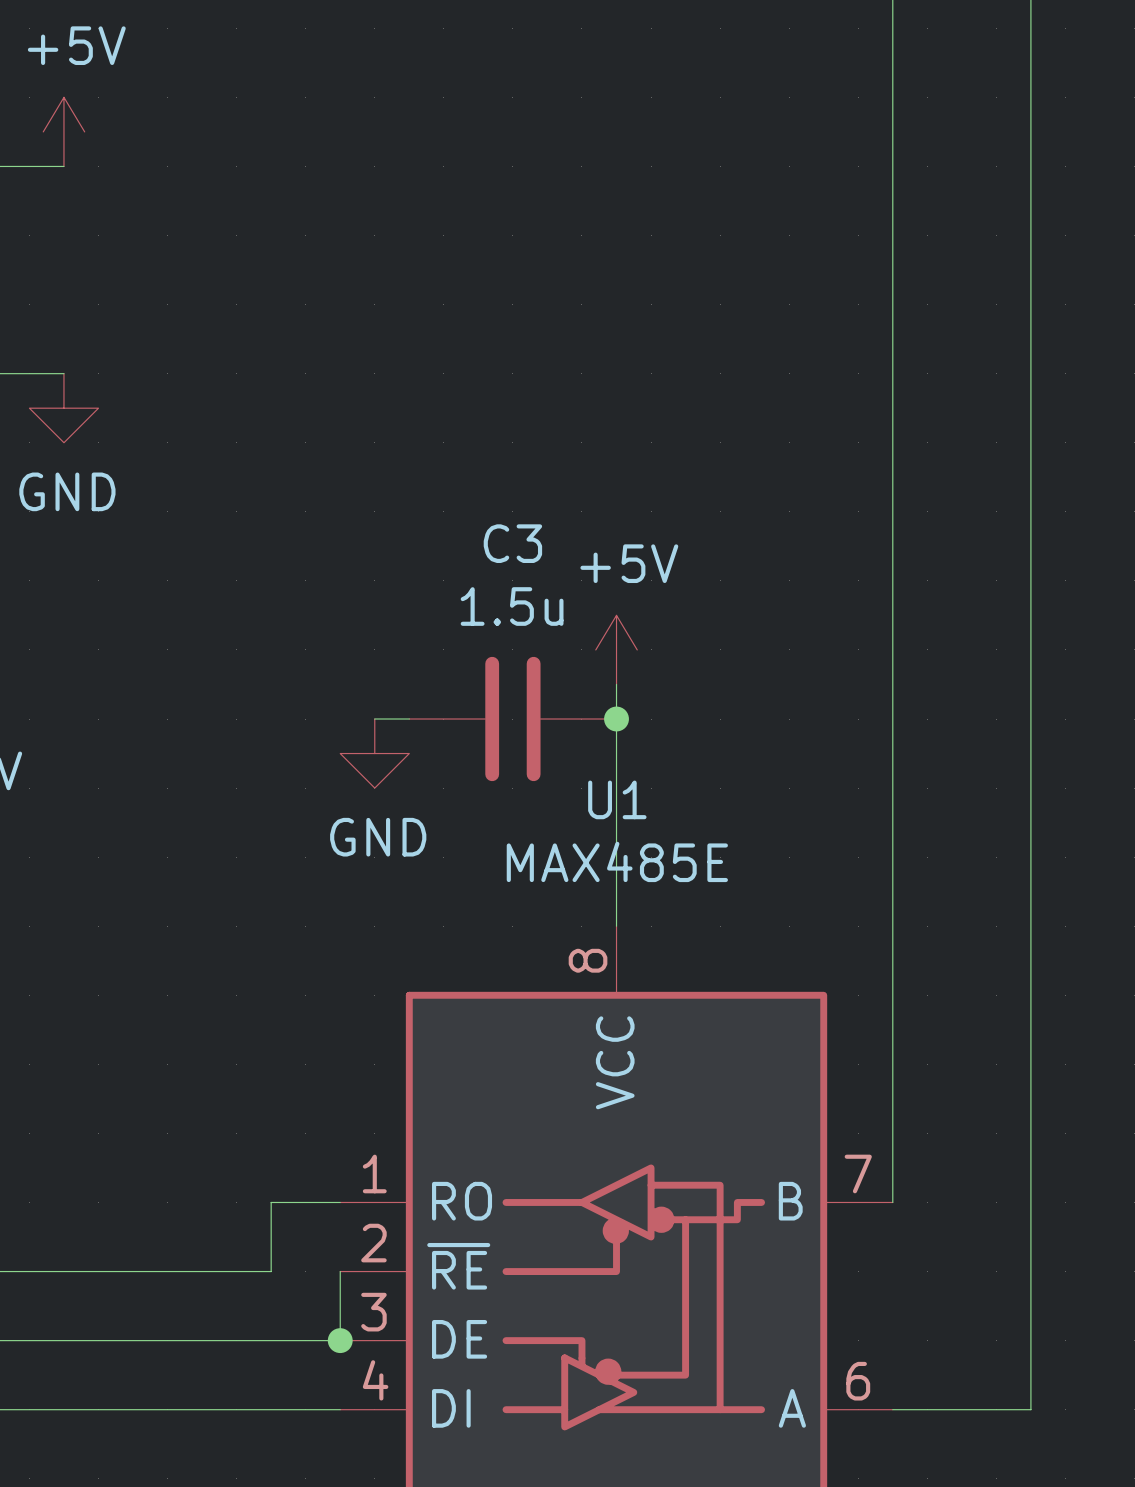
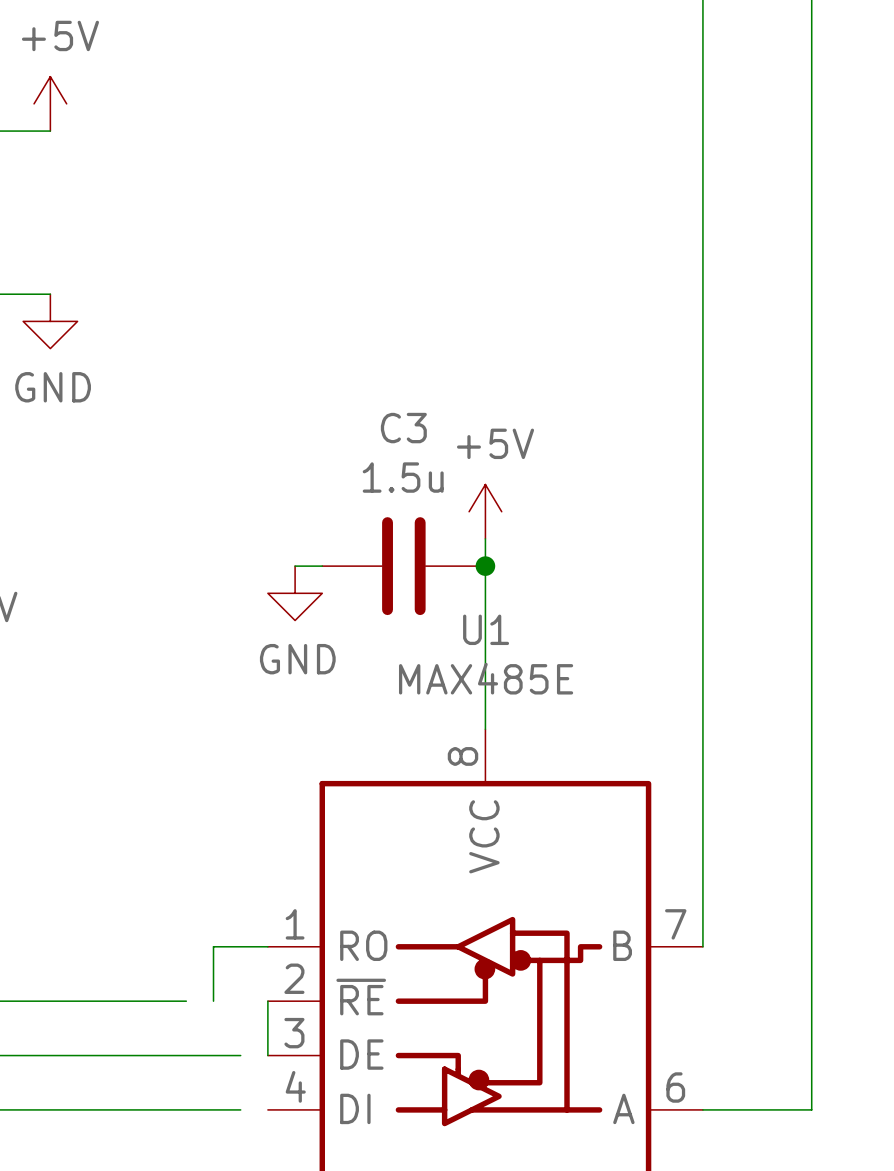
wire: (236, 1271) (271, 1271) -> none
wire: (305, 1340) (340, 1340) -> none
junction: (340, 1340) -> none
wire: (305, 1409) (340, 1409) -> none

